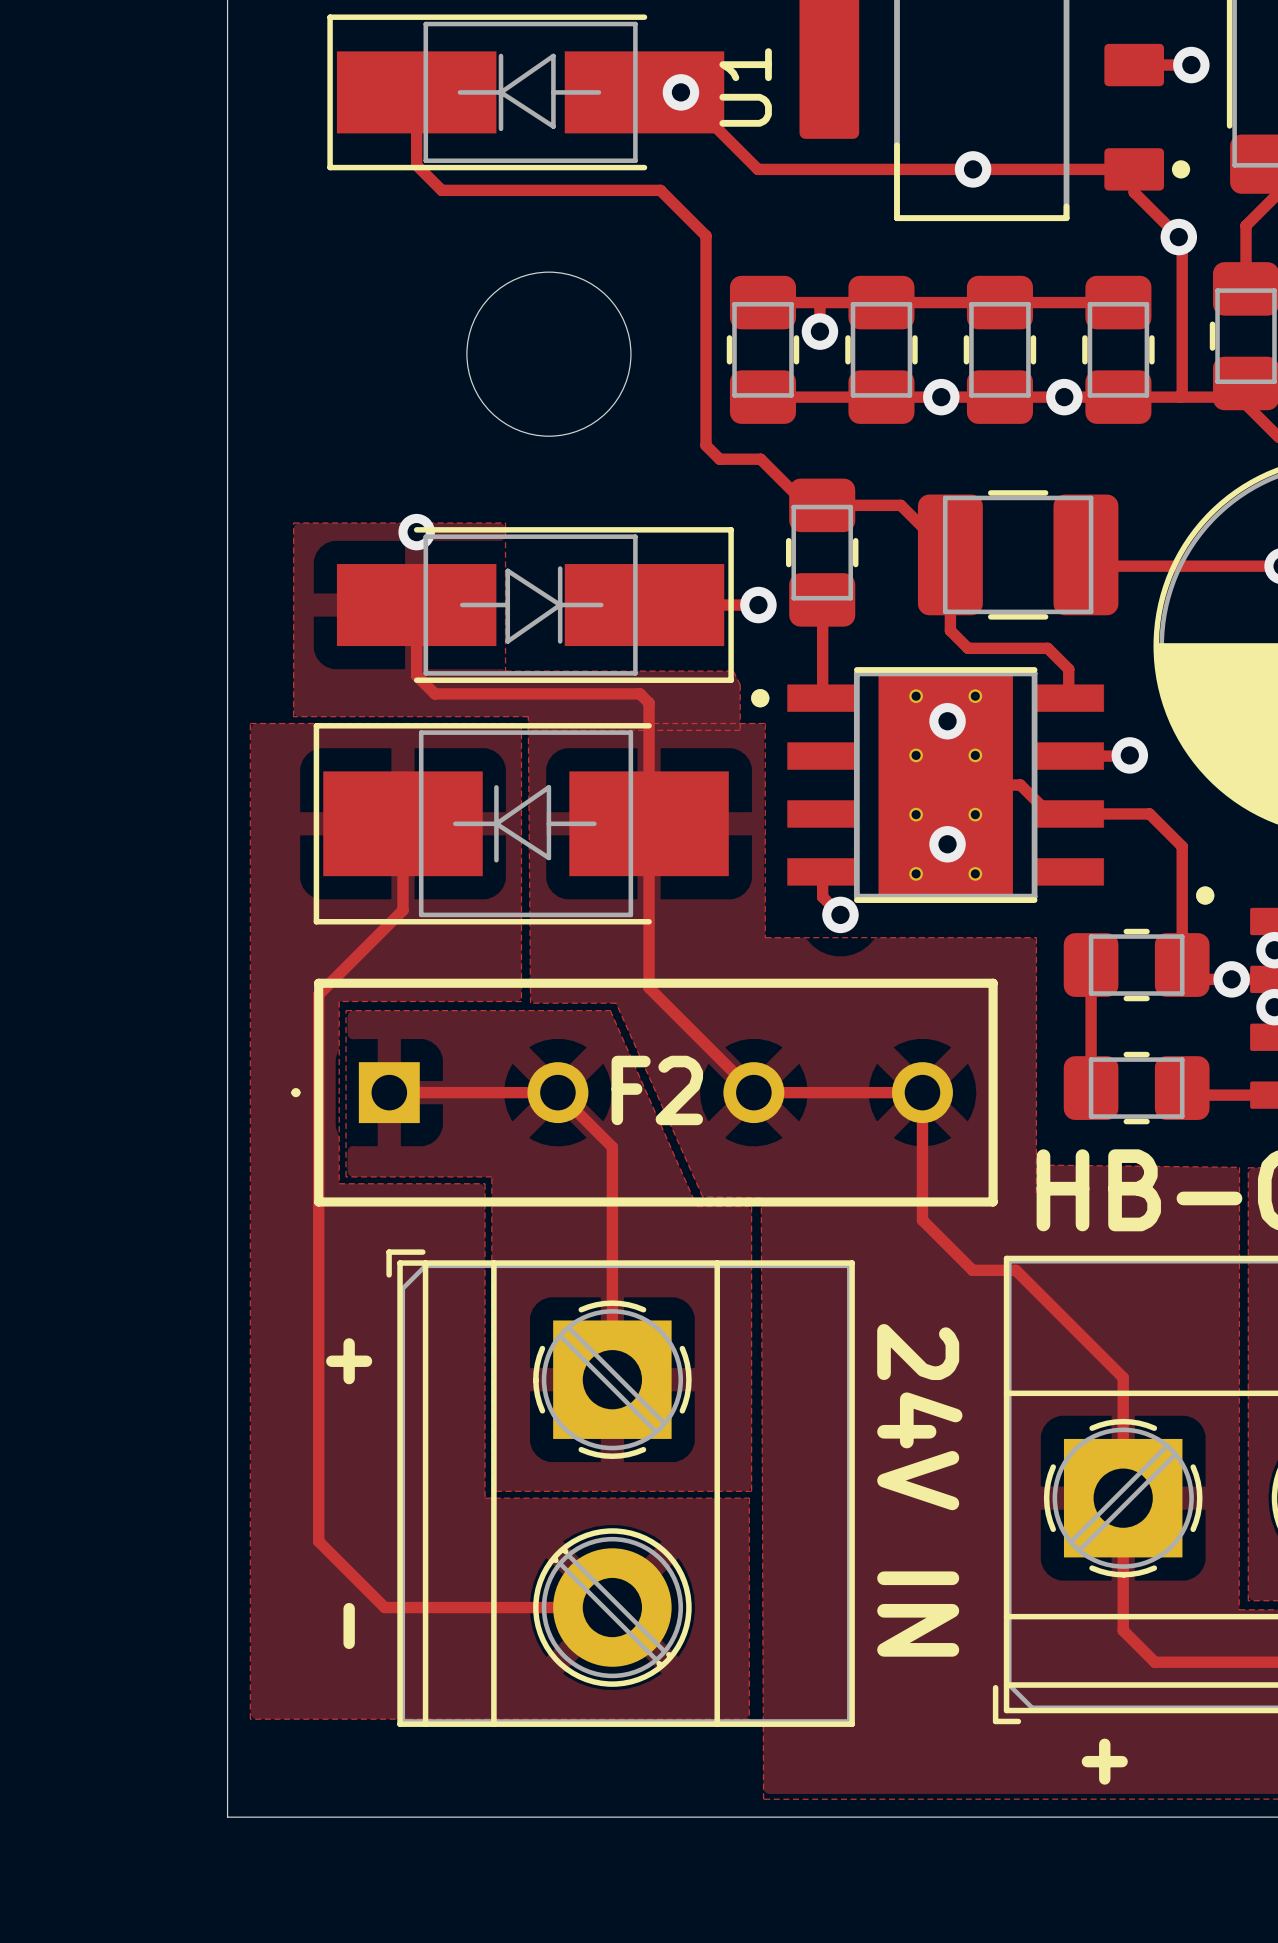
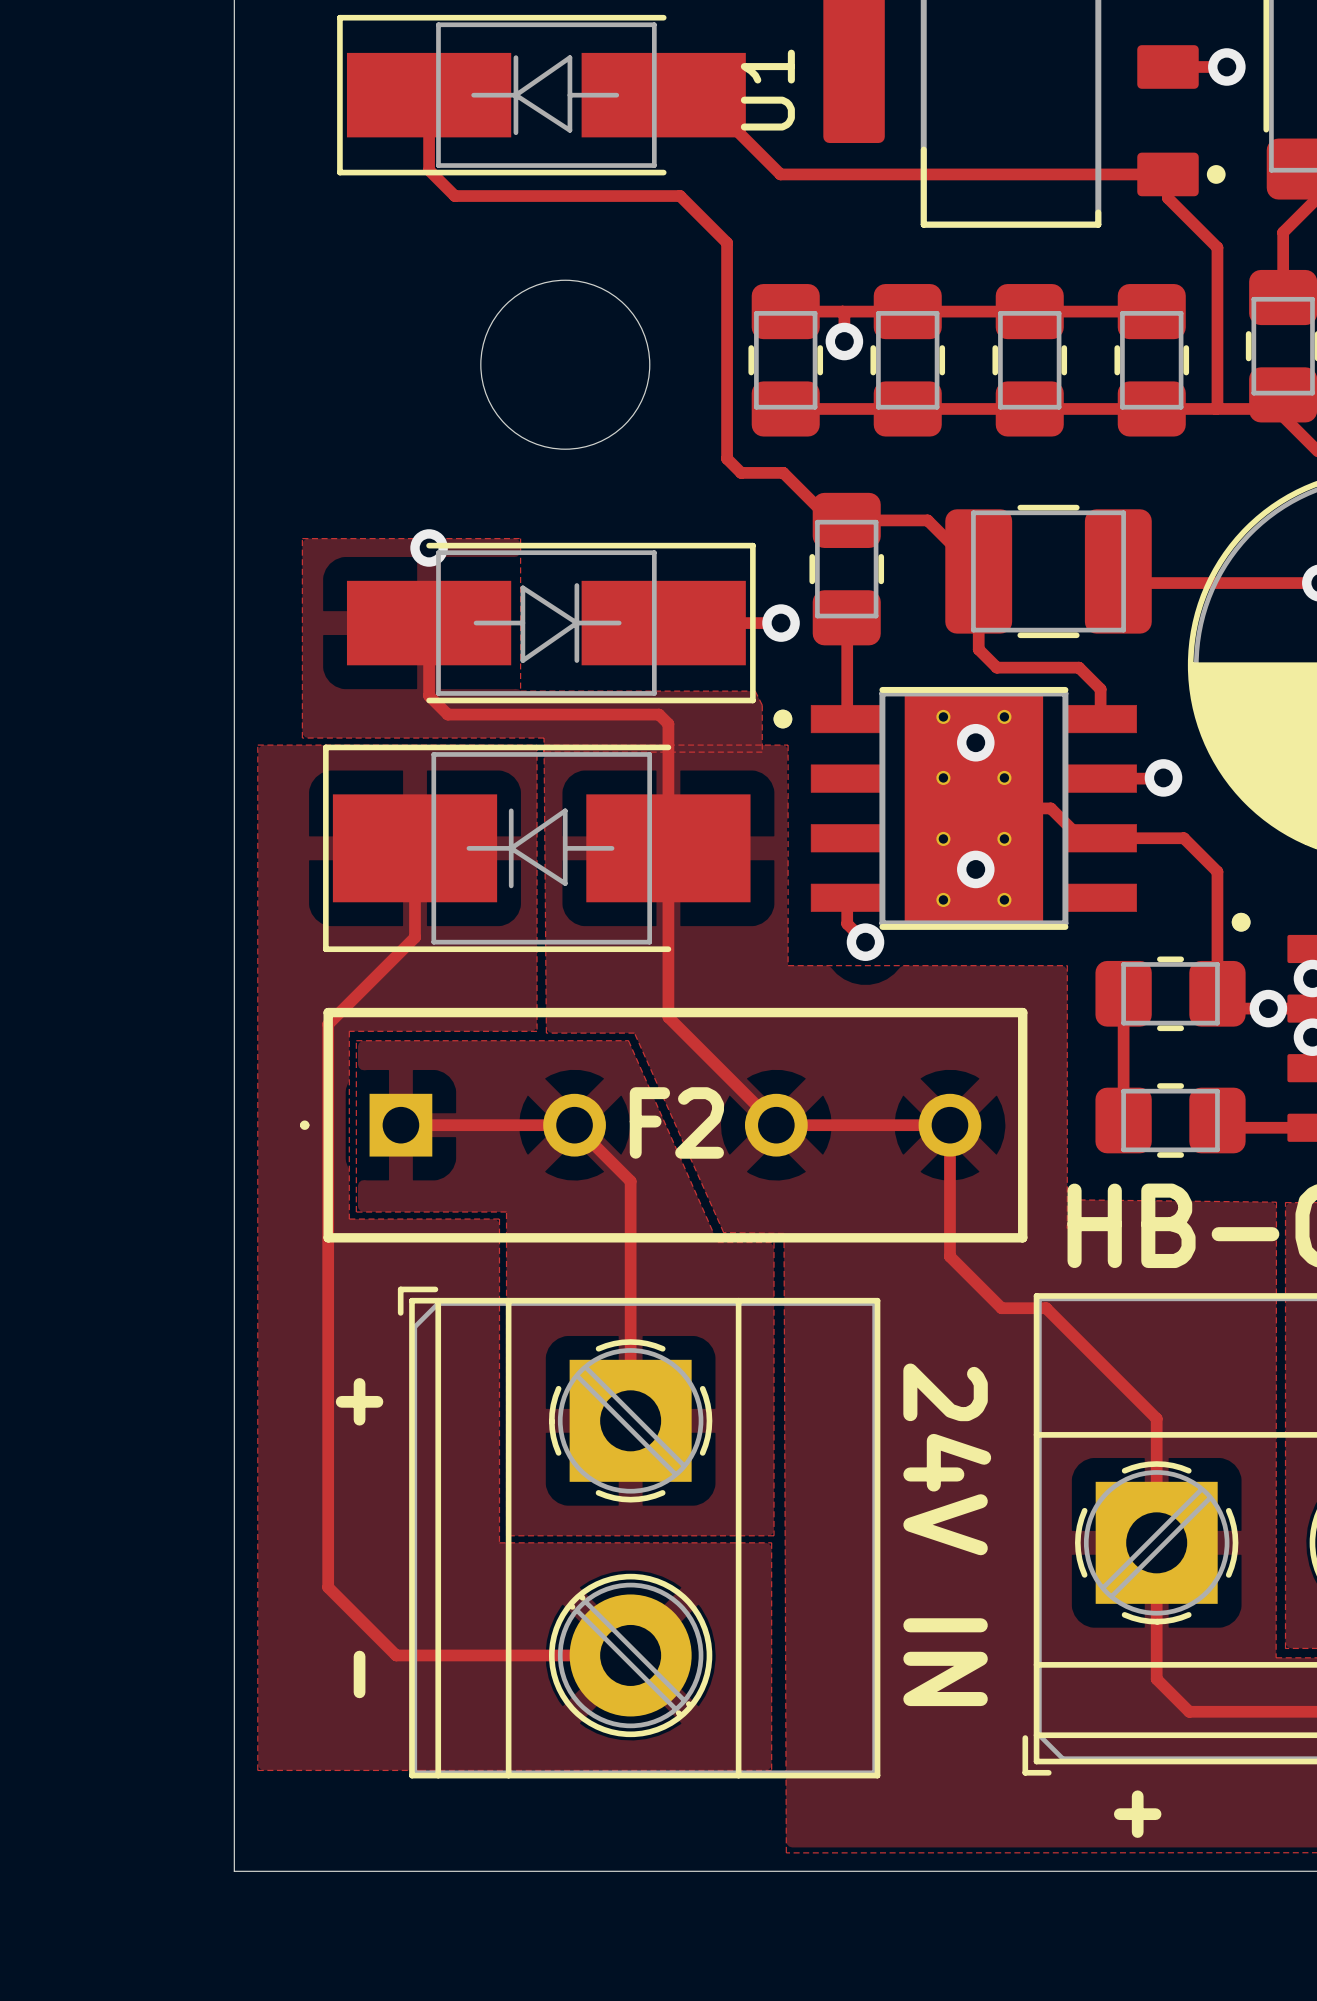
via: (680, 92) -> none
via: (973, 169) -> none
via: (1178, 237) -> none
via: (941, 397) -> none
via: (1064, 397) -> none

